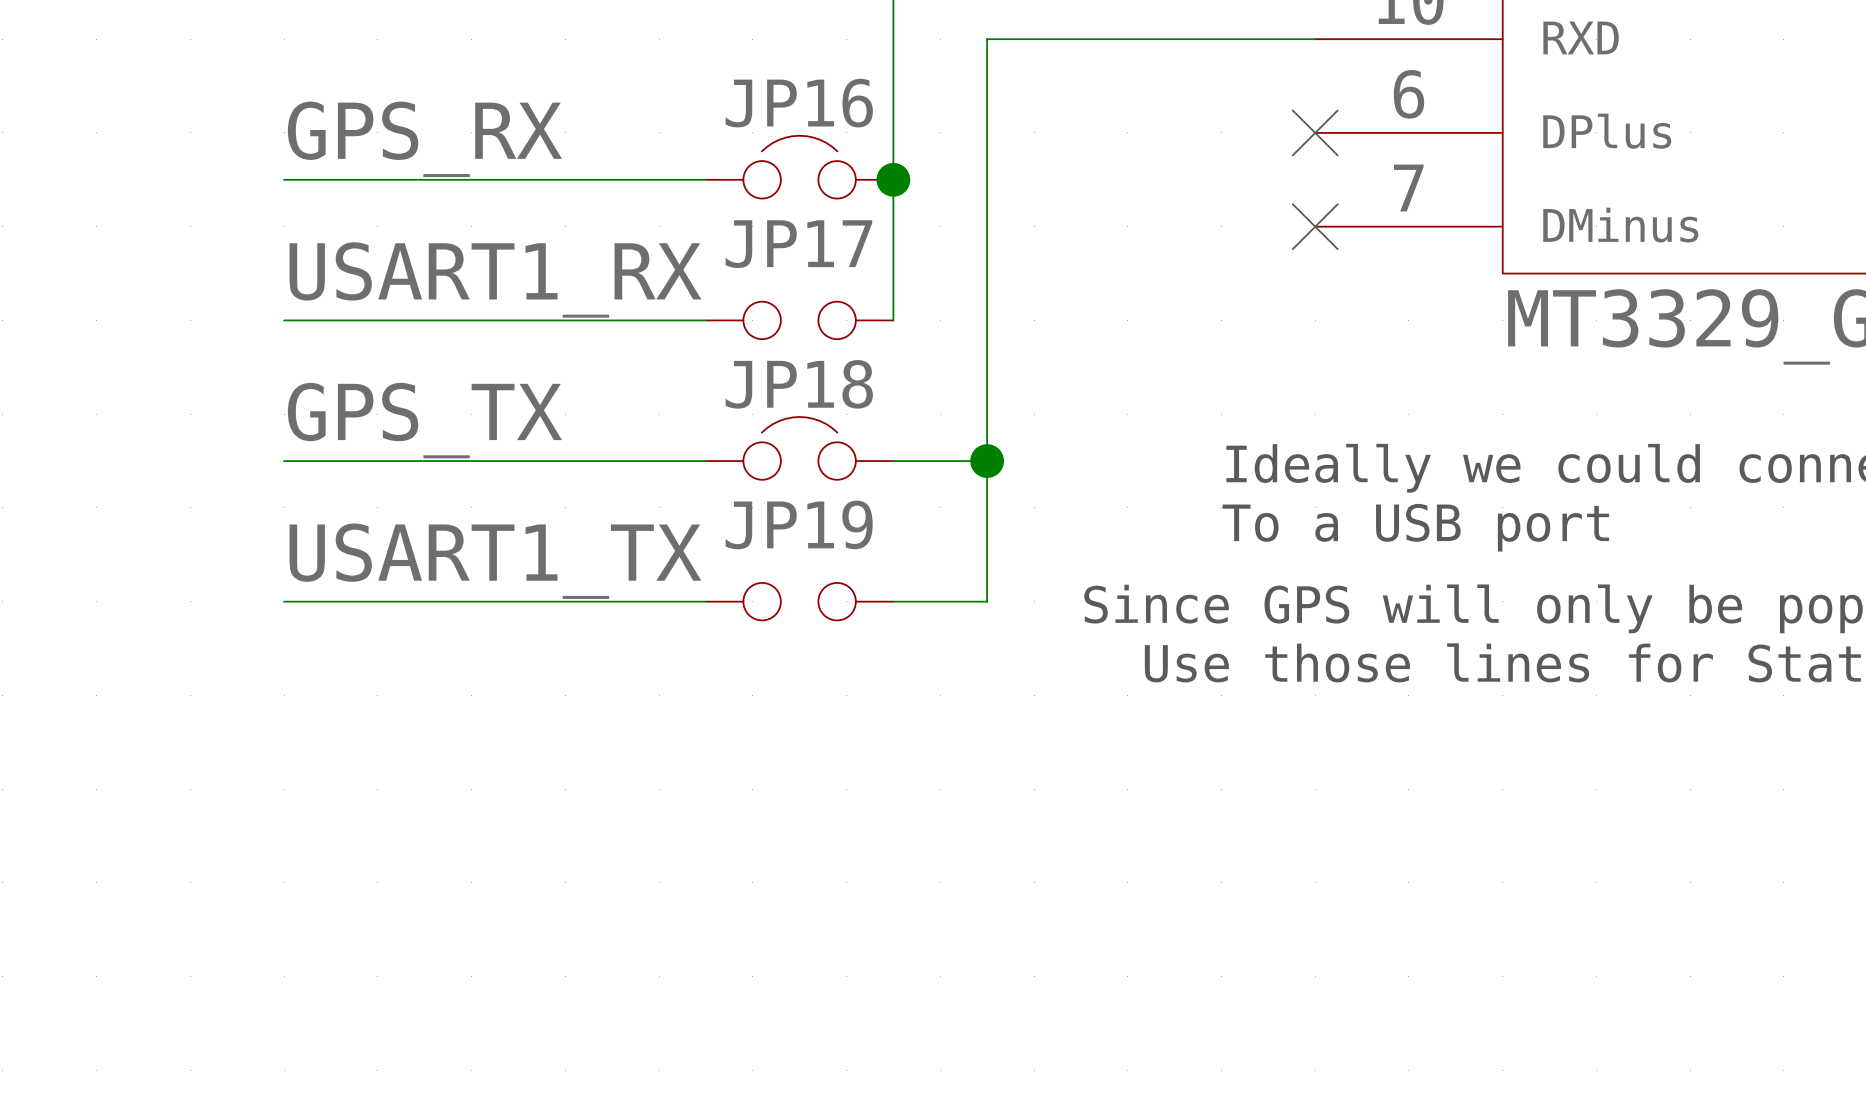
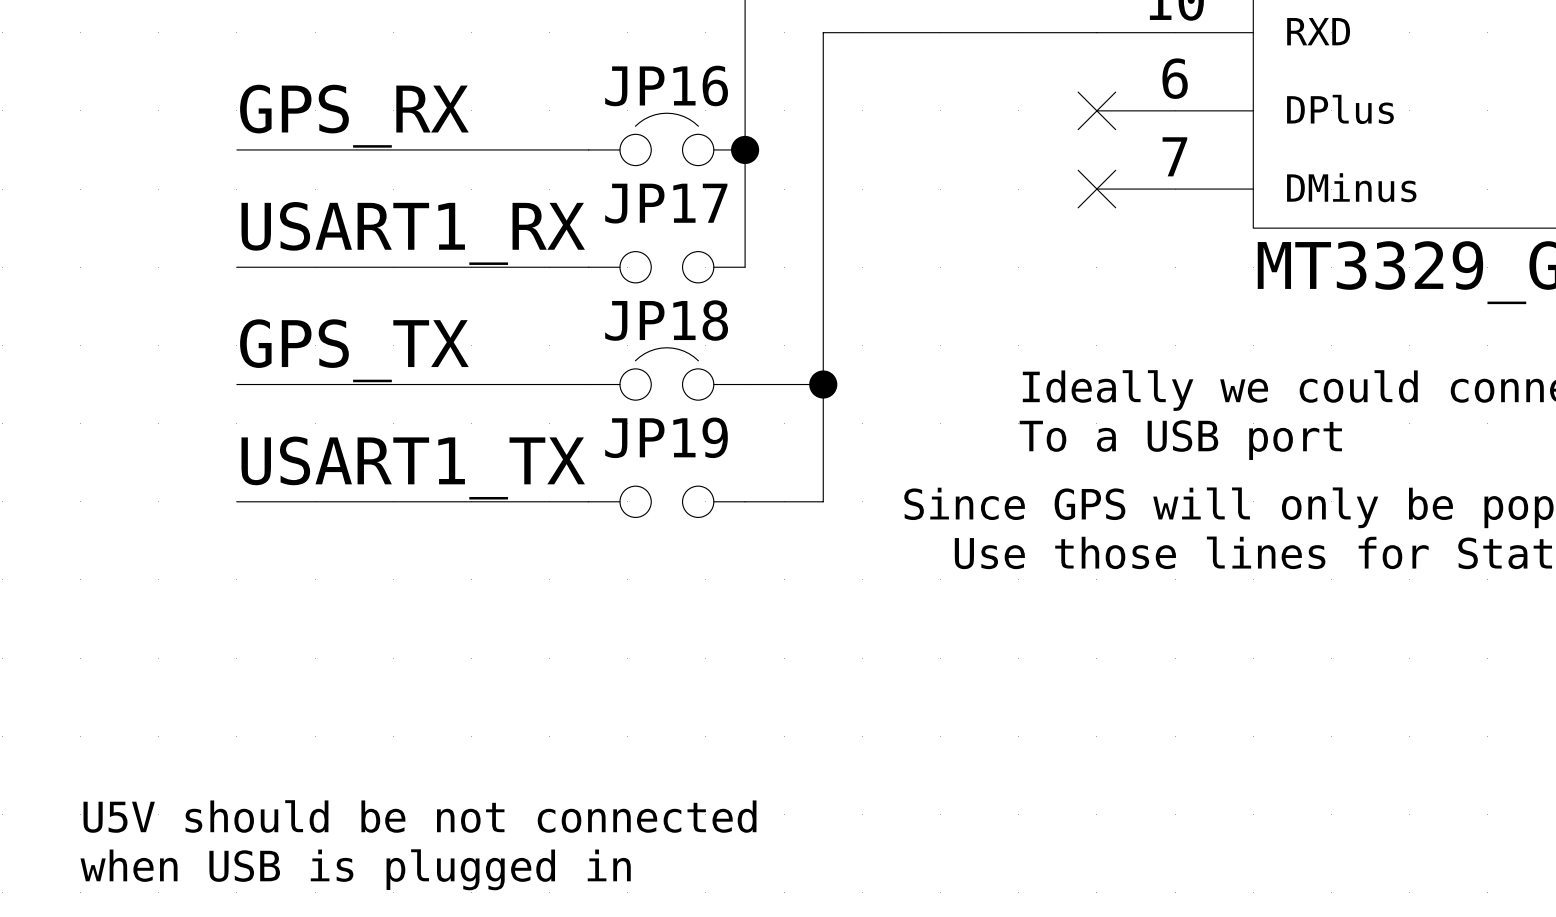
text: none -> U5V should be not connected (419, 816)
text: none -> when USB is plugged in (355, 869)

